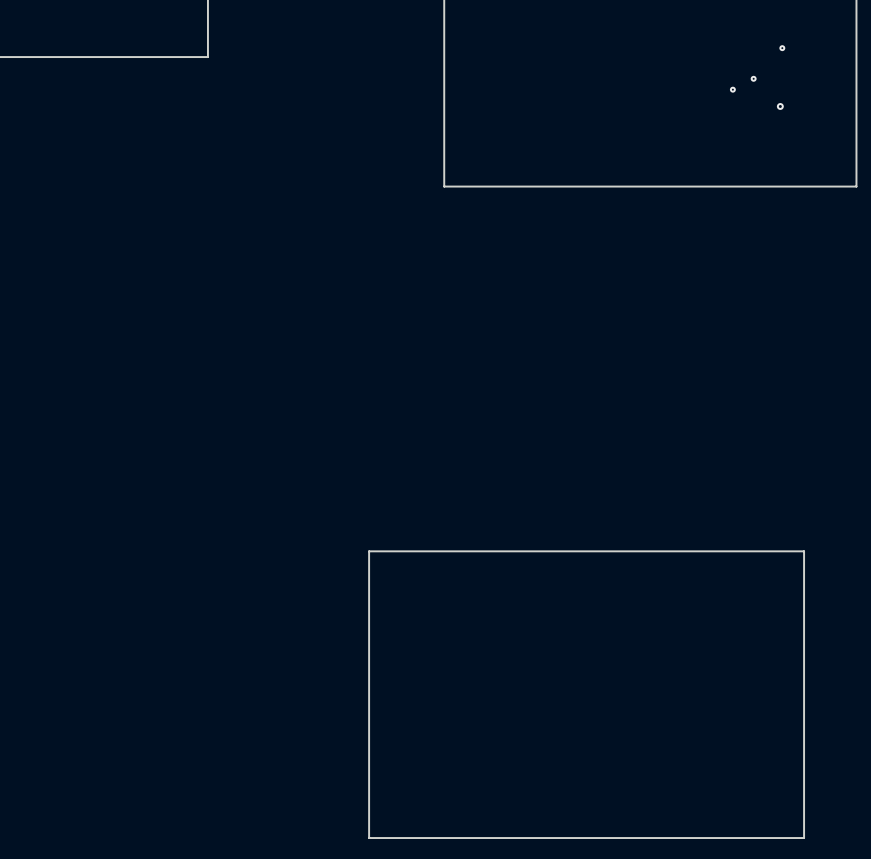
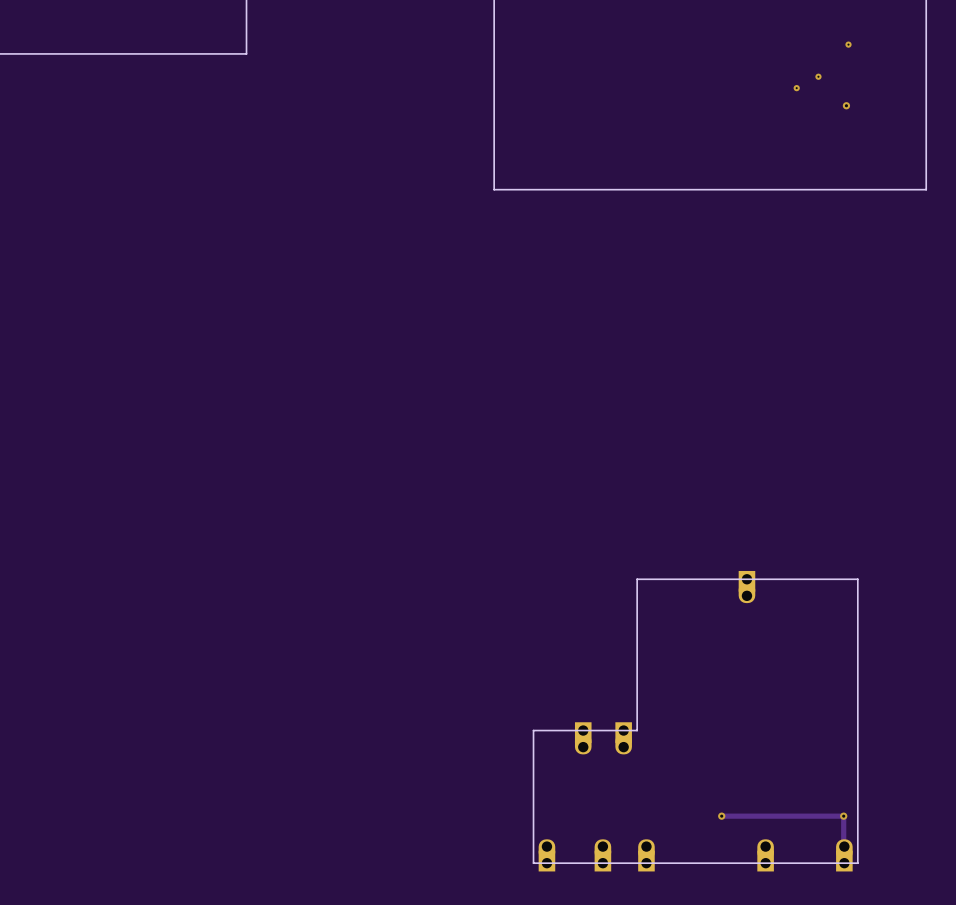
board edge: (804, 551) (369, 551) (369, 838) (804, 838) (804, 551) -> (857, 579) (857, 863) (533, 863) (533, 730) (637, 730) (637, 579) (857, 579)
part: none -> (746, 587)
part: none -> (583, 738)
part: none -> (623, 738)
track: none -> (721, 816) (843, 816) (843, 845)
via: none -> (721, 816)
via: none -> (843, 816)
part: none -> (546, 855)
part: none -> (602, 855)
part: none -> (646, 855)
part: none -> (765, 855)
part: none -> (844, 855)

